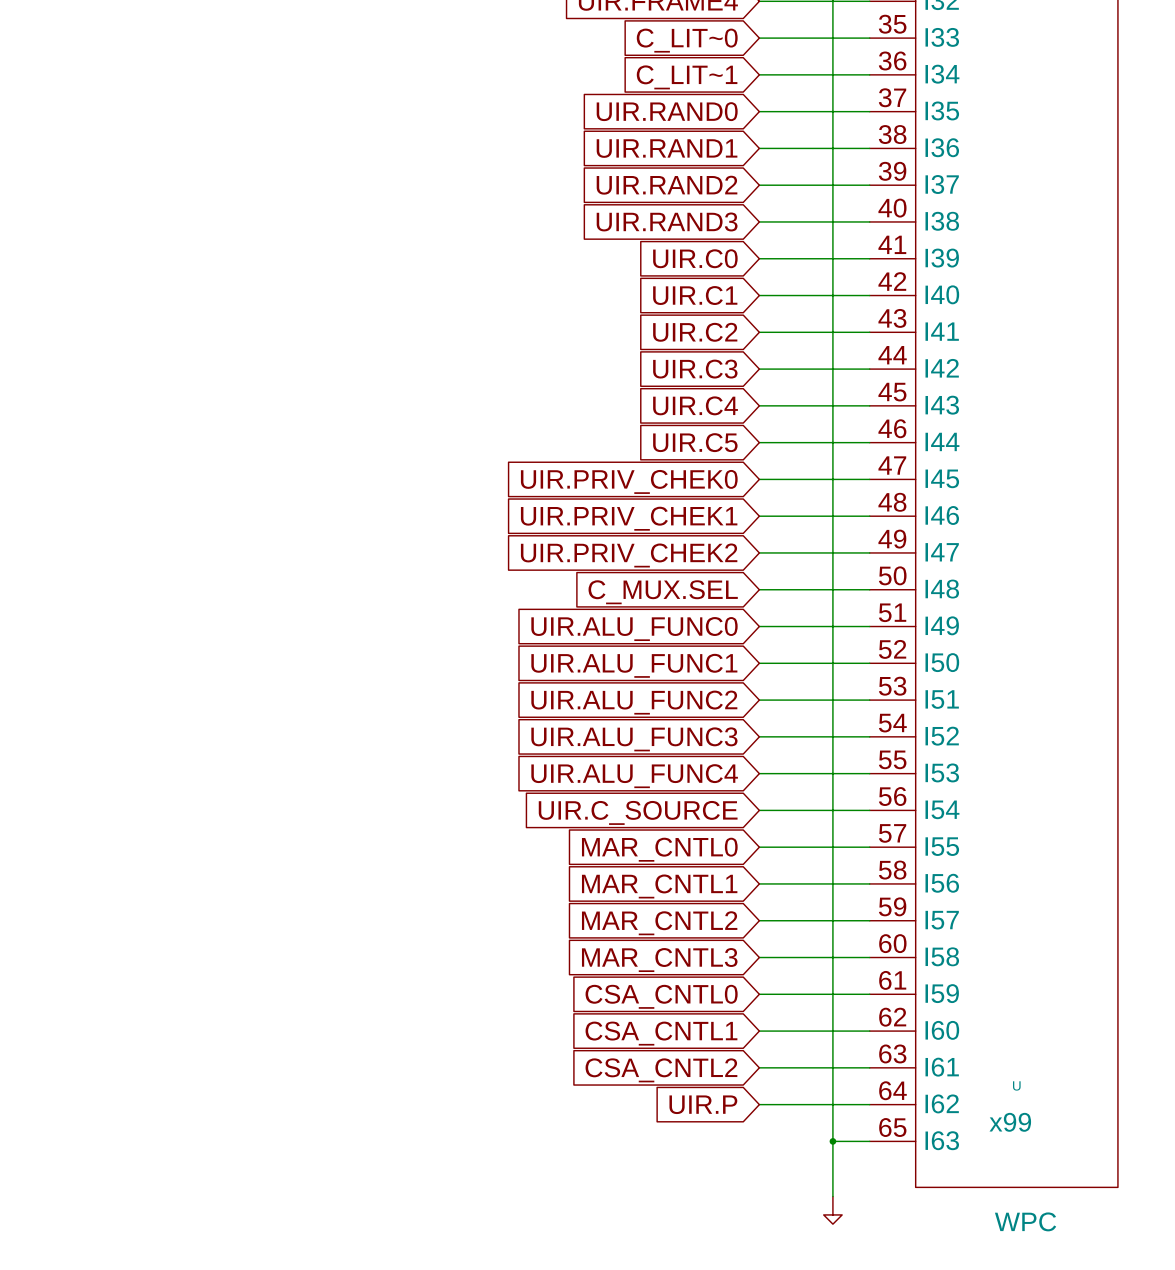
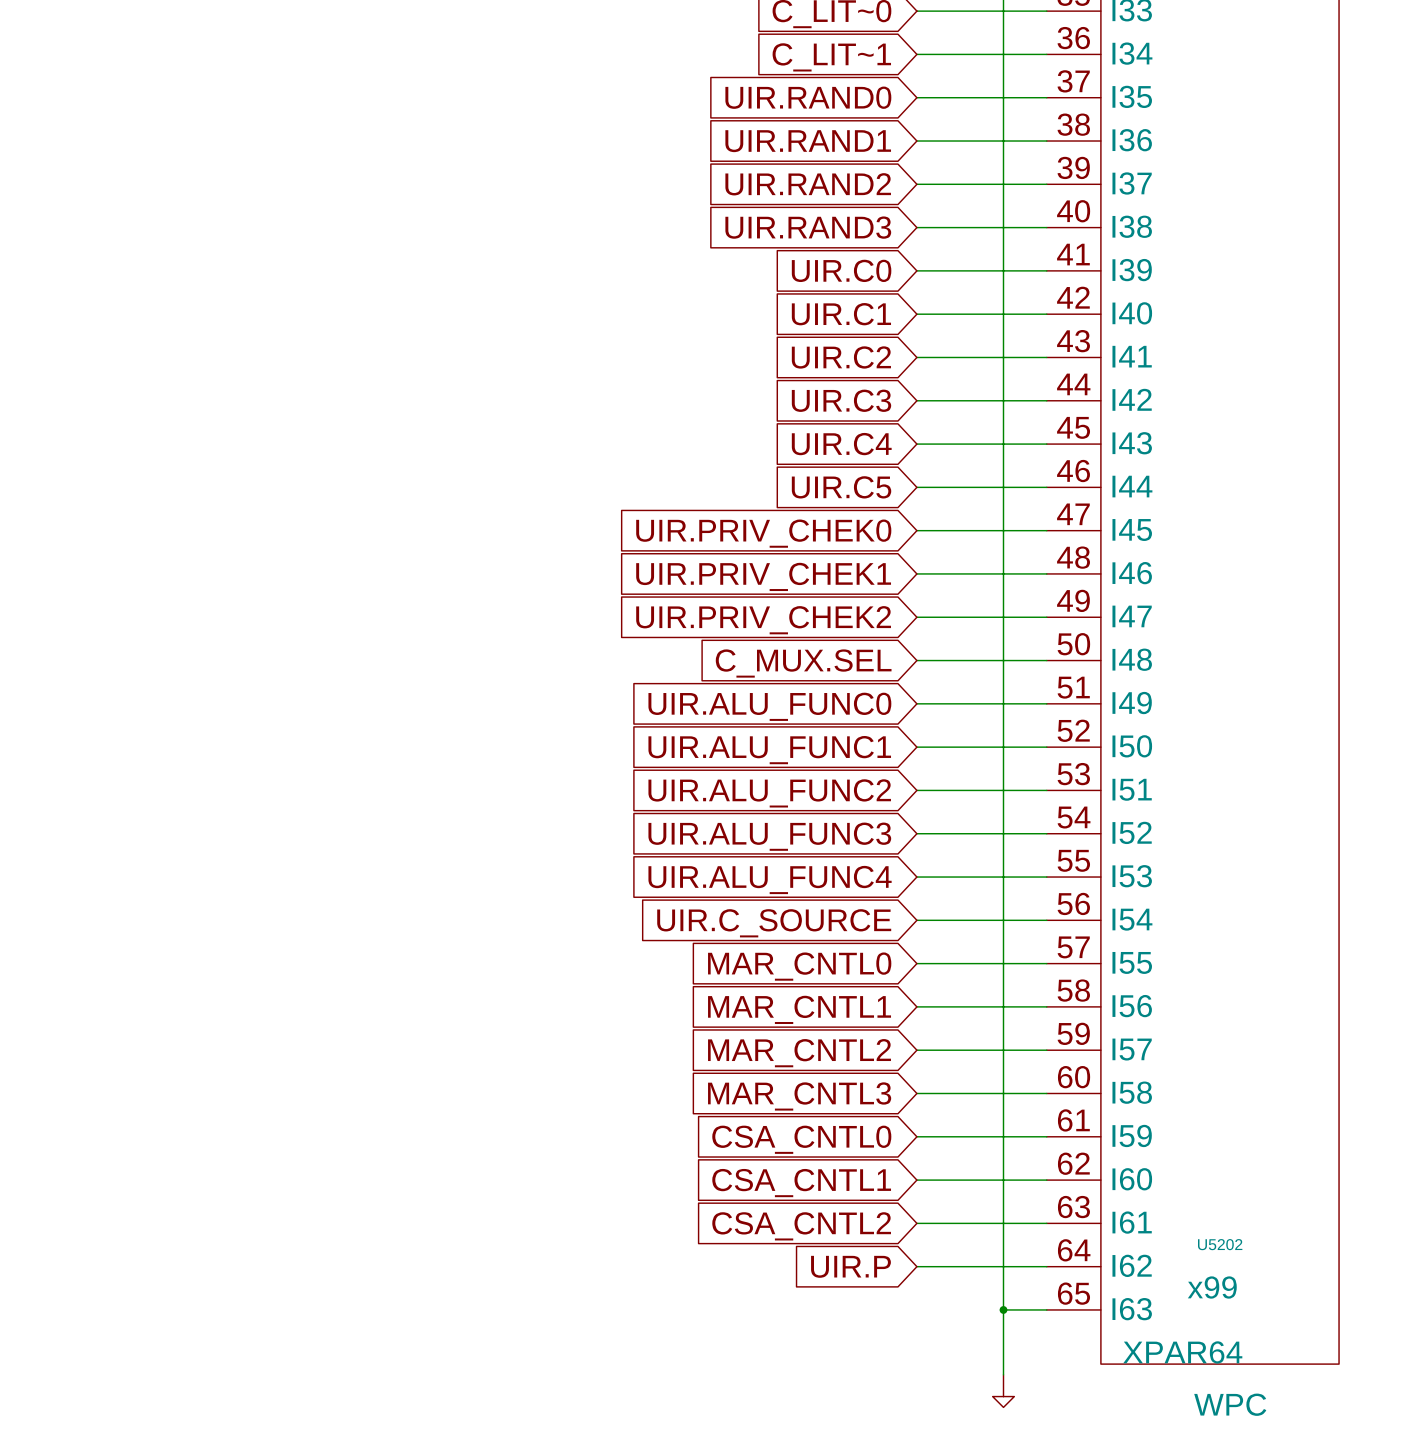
U name: U (1016, 1085) -> U5202 (1220, 1244)
U value: none -> XPAR64 (1182, 1352)

